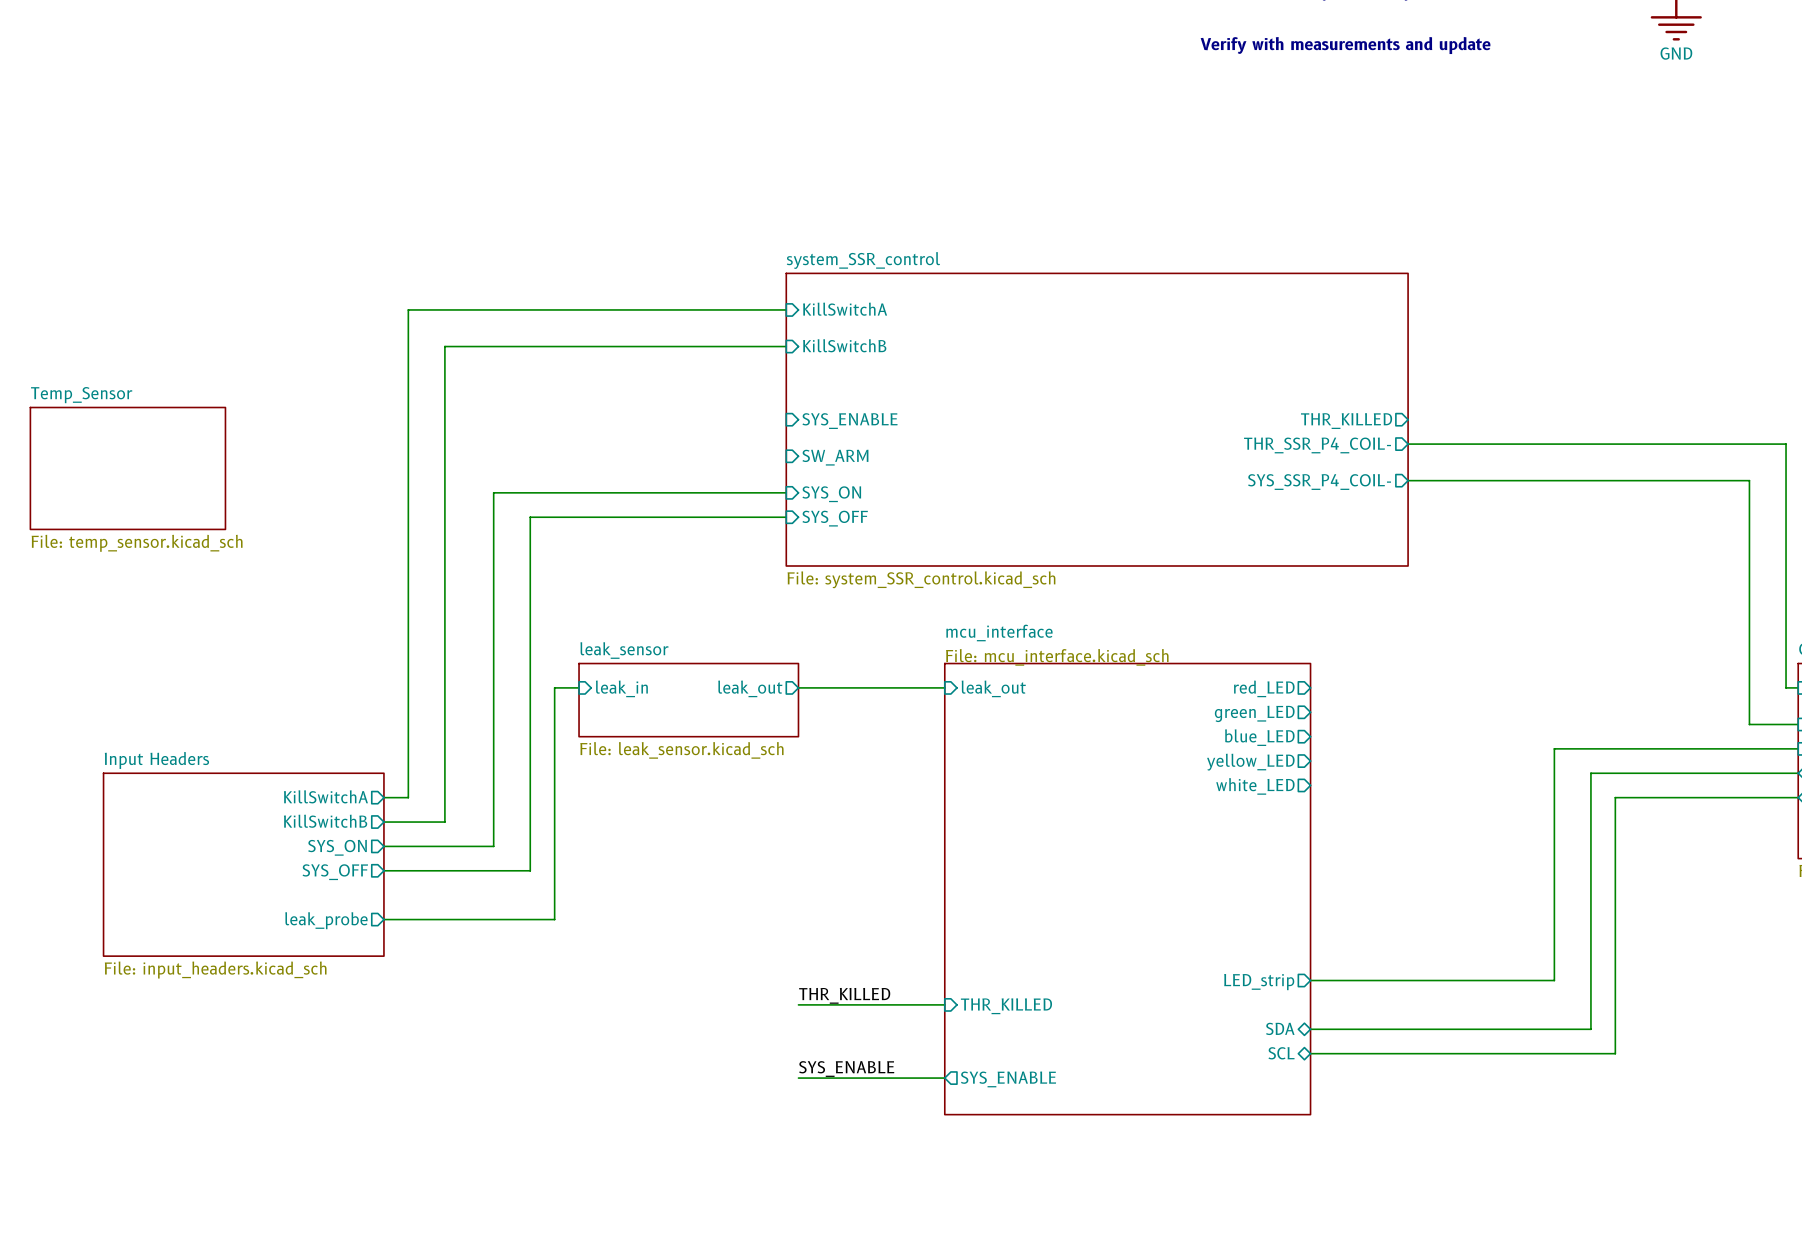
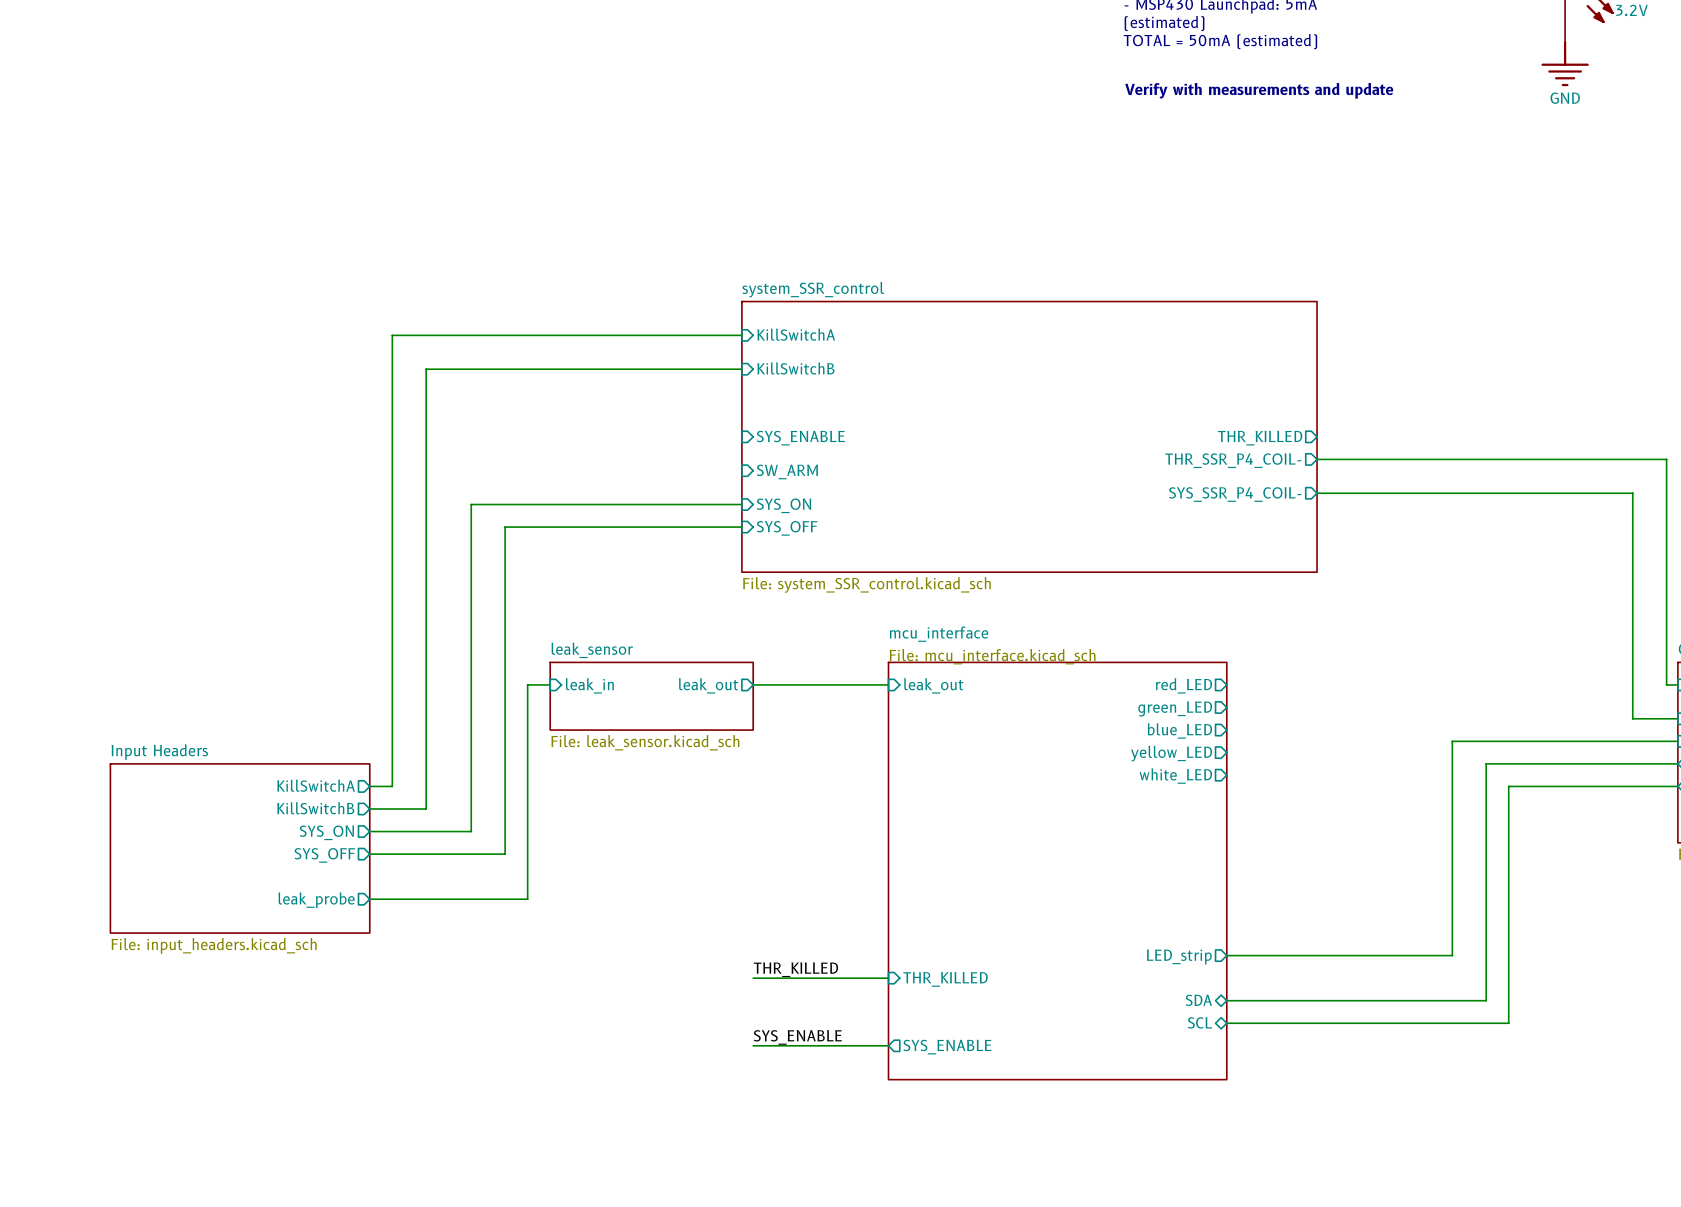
sheet Temp_Sensor: File: temp_sensor.kicad_sch (127, 468) -> none

